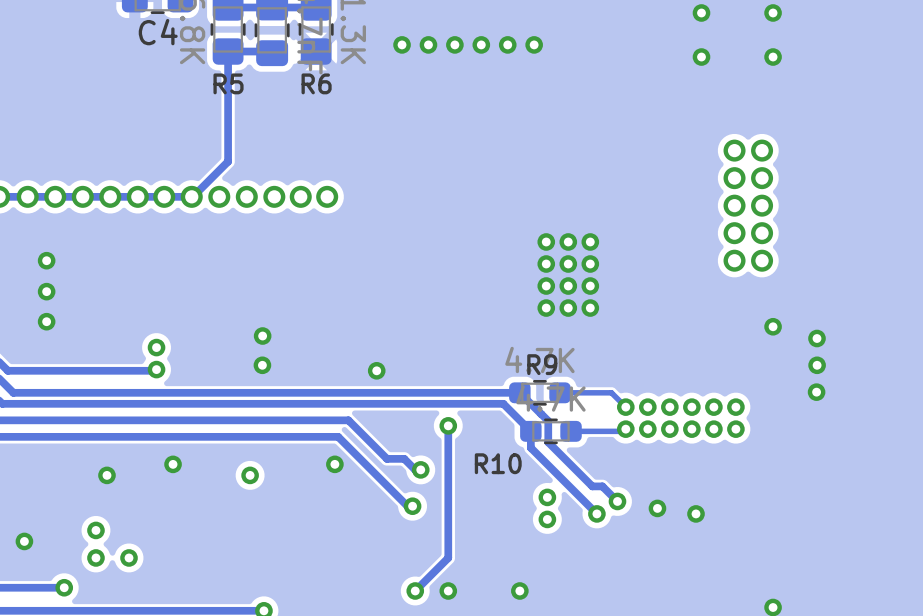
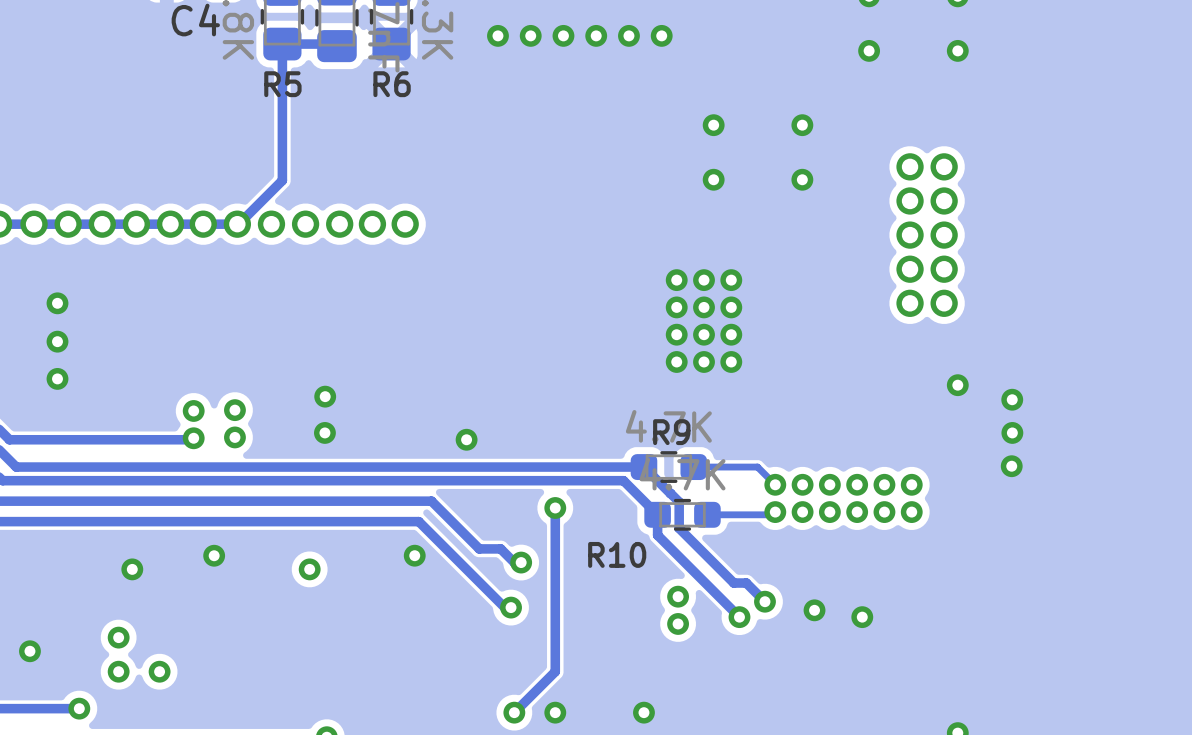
via: none -> (713, 125)
via: none -> (802, 125)
via: none -> (713, 179)
via: none -> (802, 179)
via: none -> (234, 410)
via: none -> (234, 437)

